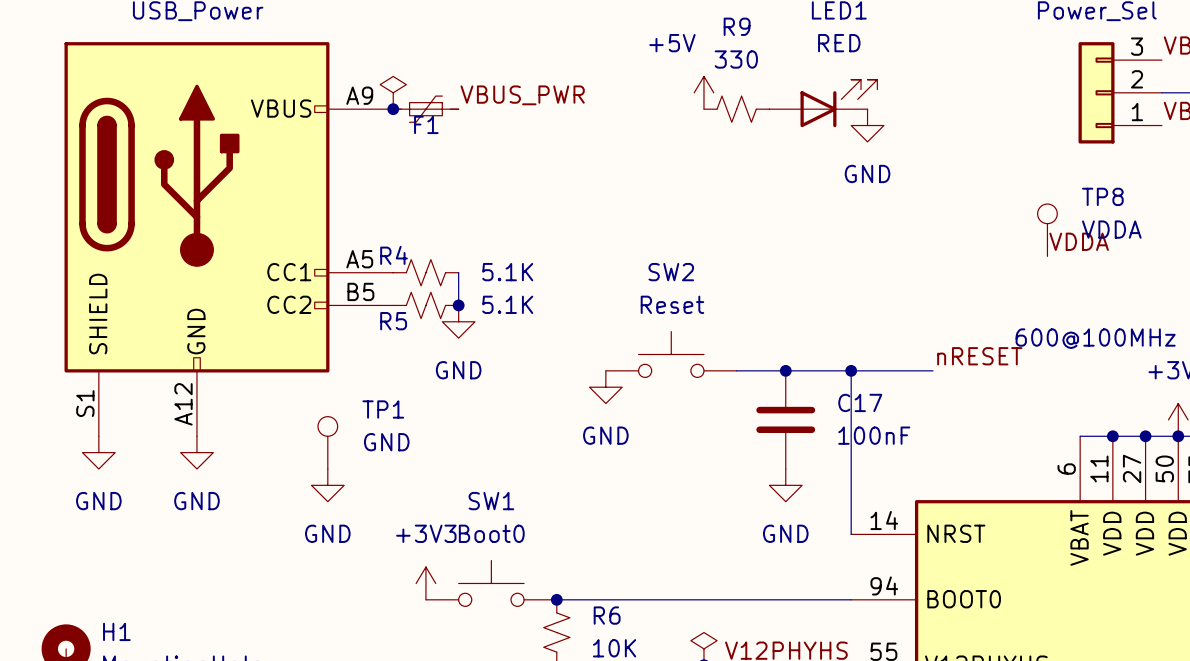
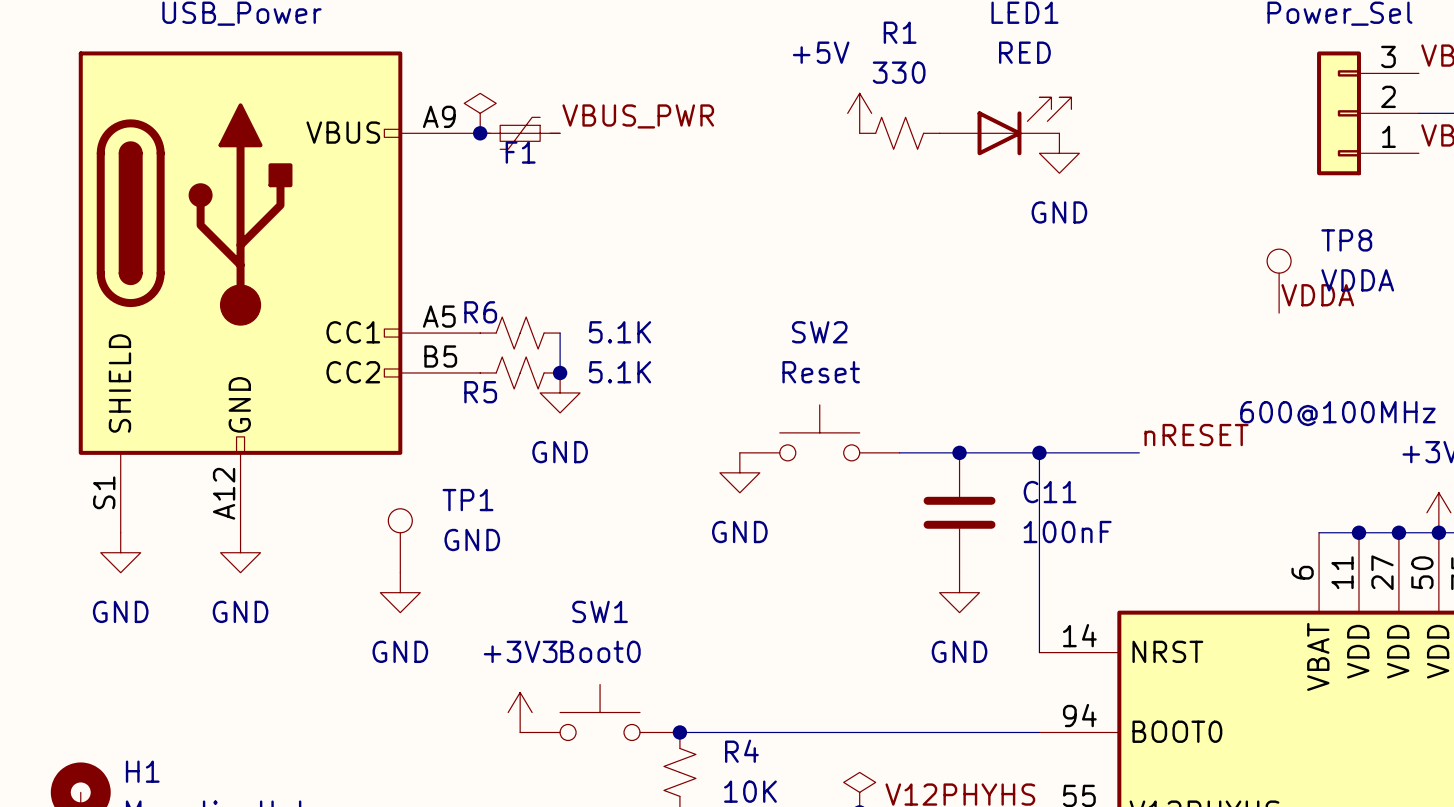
R9 name: R9 (737, 26) -> R1 (900, 32)
R4 name: R4 (394, 255) -> R6 (480, 312)
C17 name: C17 (860, 402) -> C11 (1050, 492)
R6 name: R6 (607, 615) -> R4 (741, 751)

